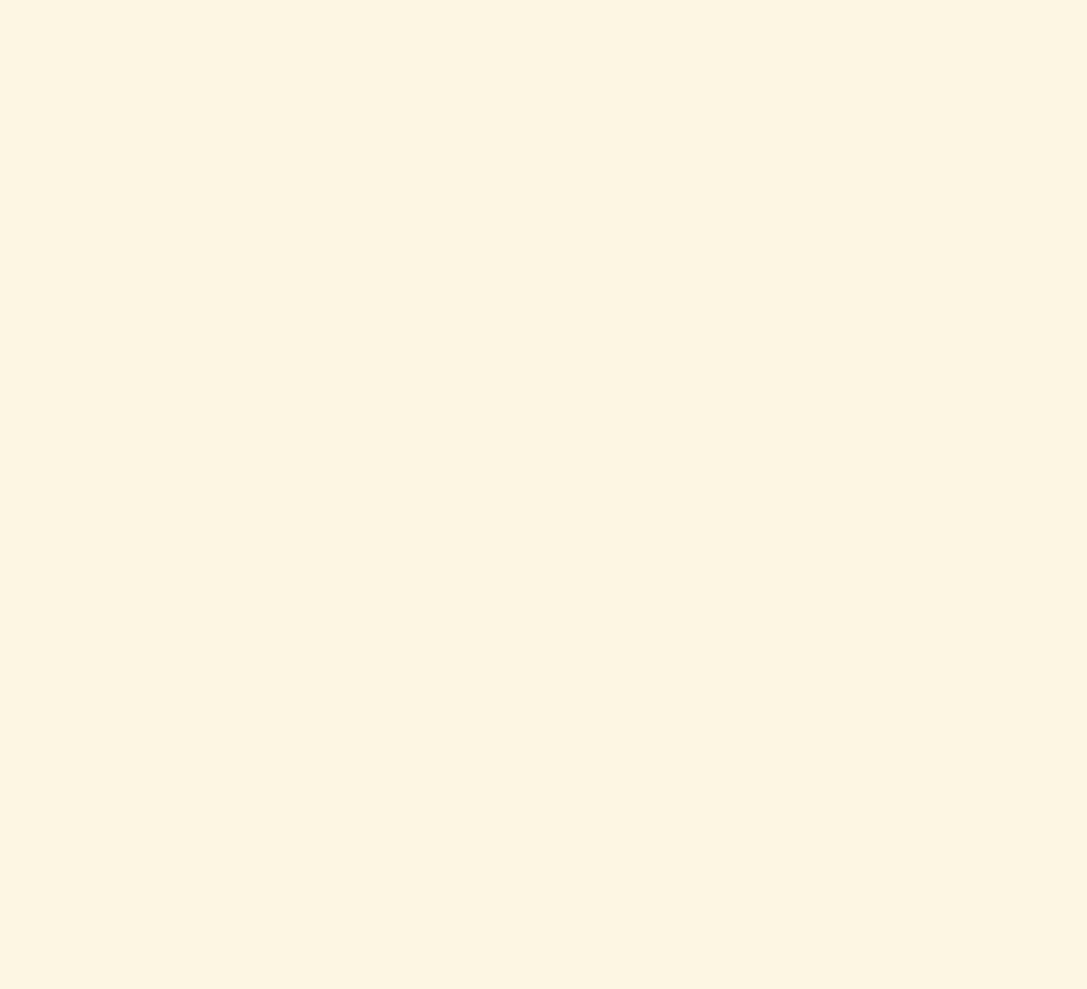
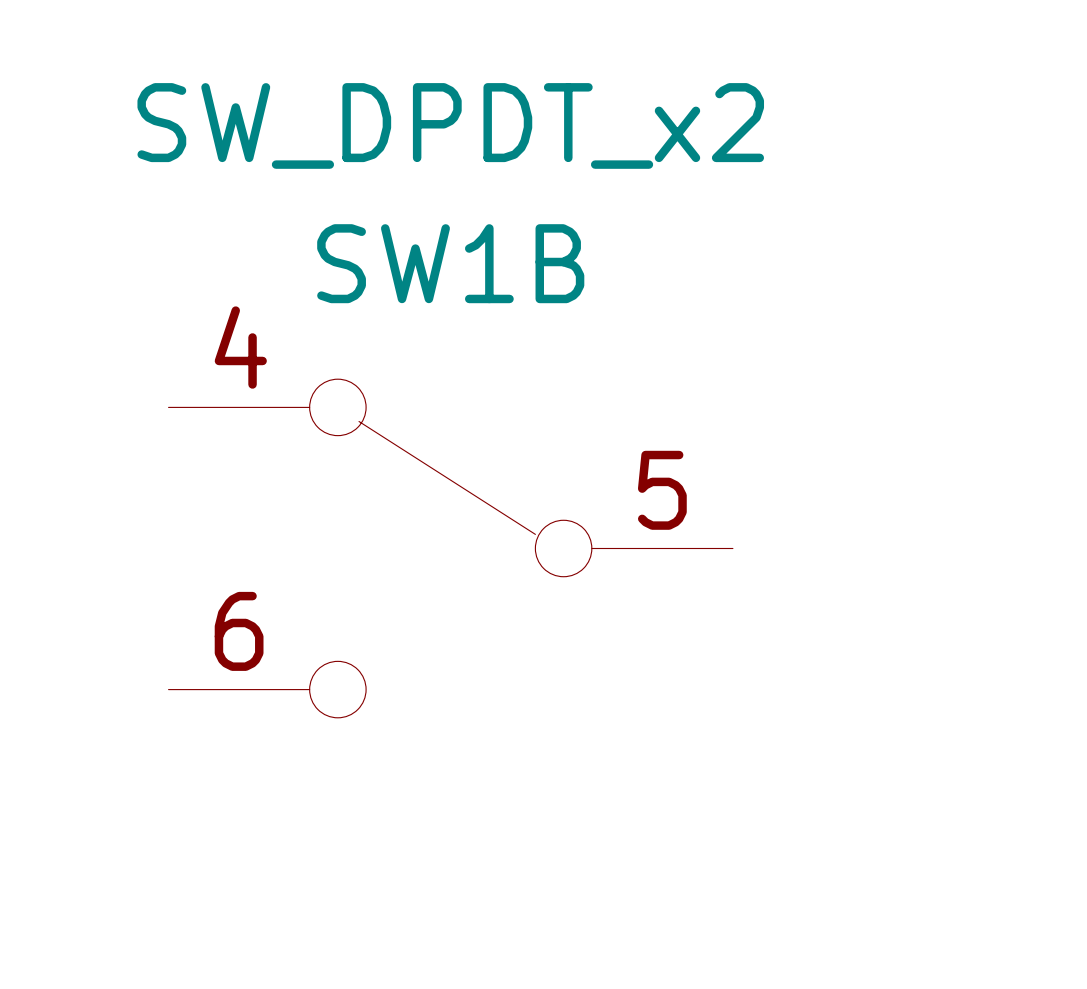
SW1B: none -> SW_DPDT_x2 (450, 548)

